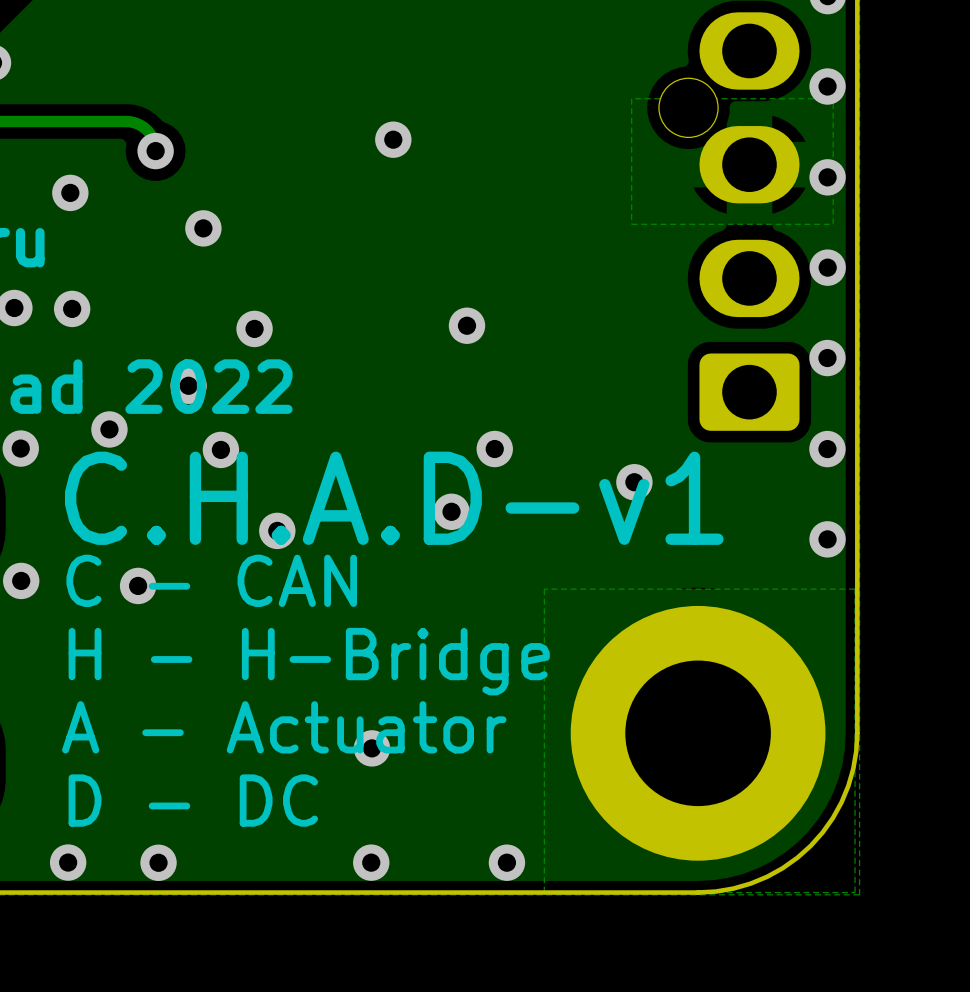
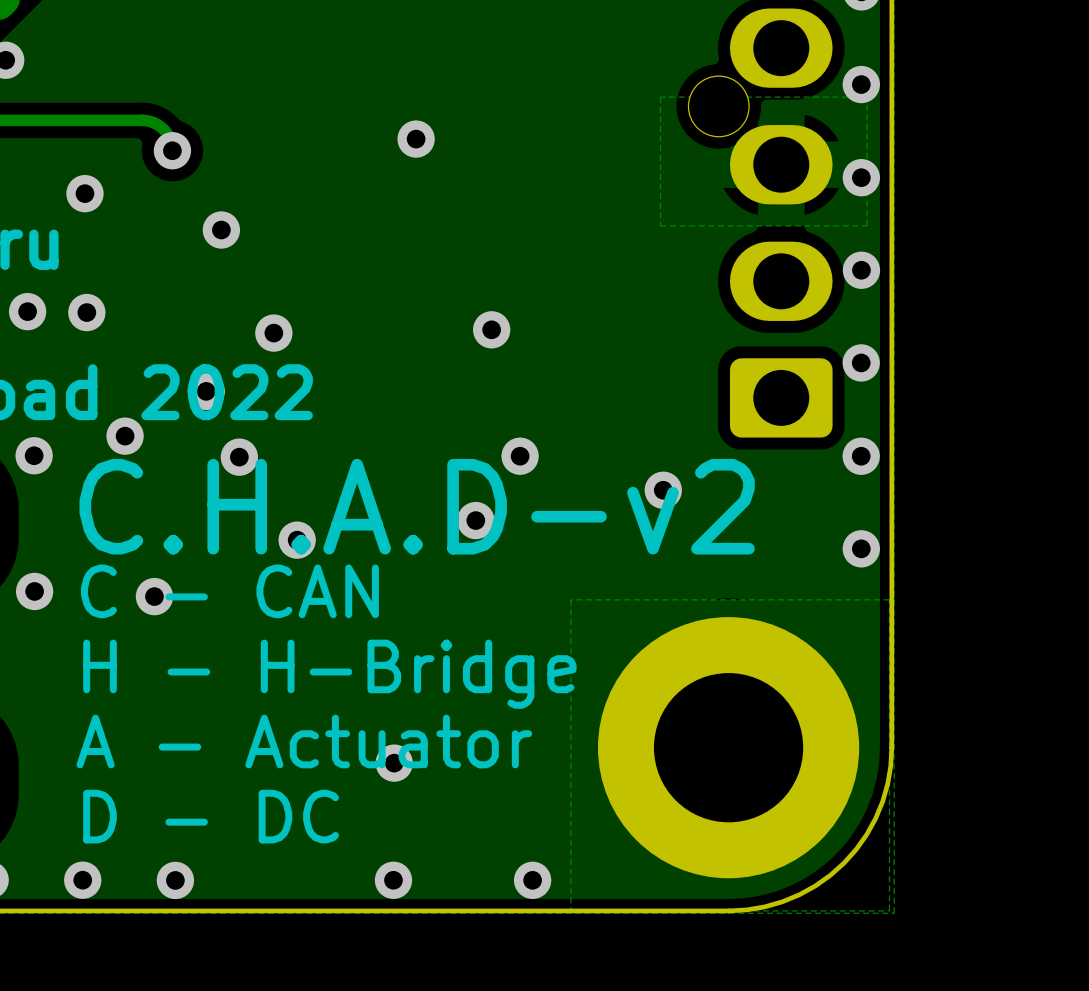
text: C.H.A.D-v1 (394, 498) -> C.H.A.D-v2 (417, 506)

